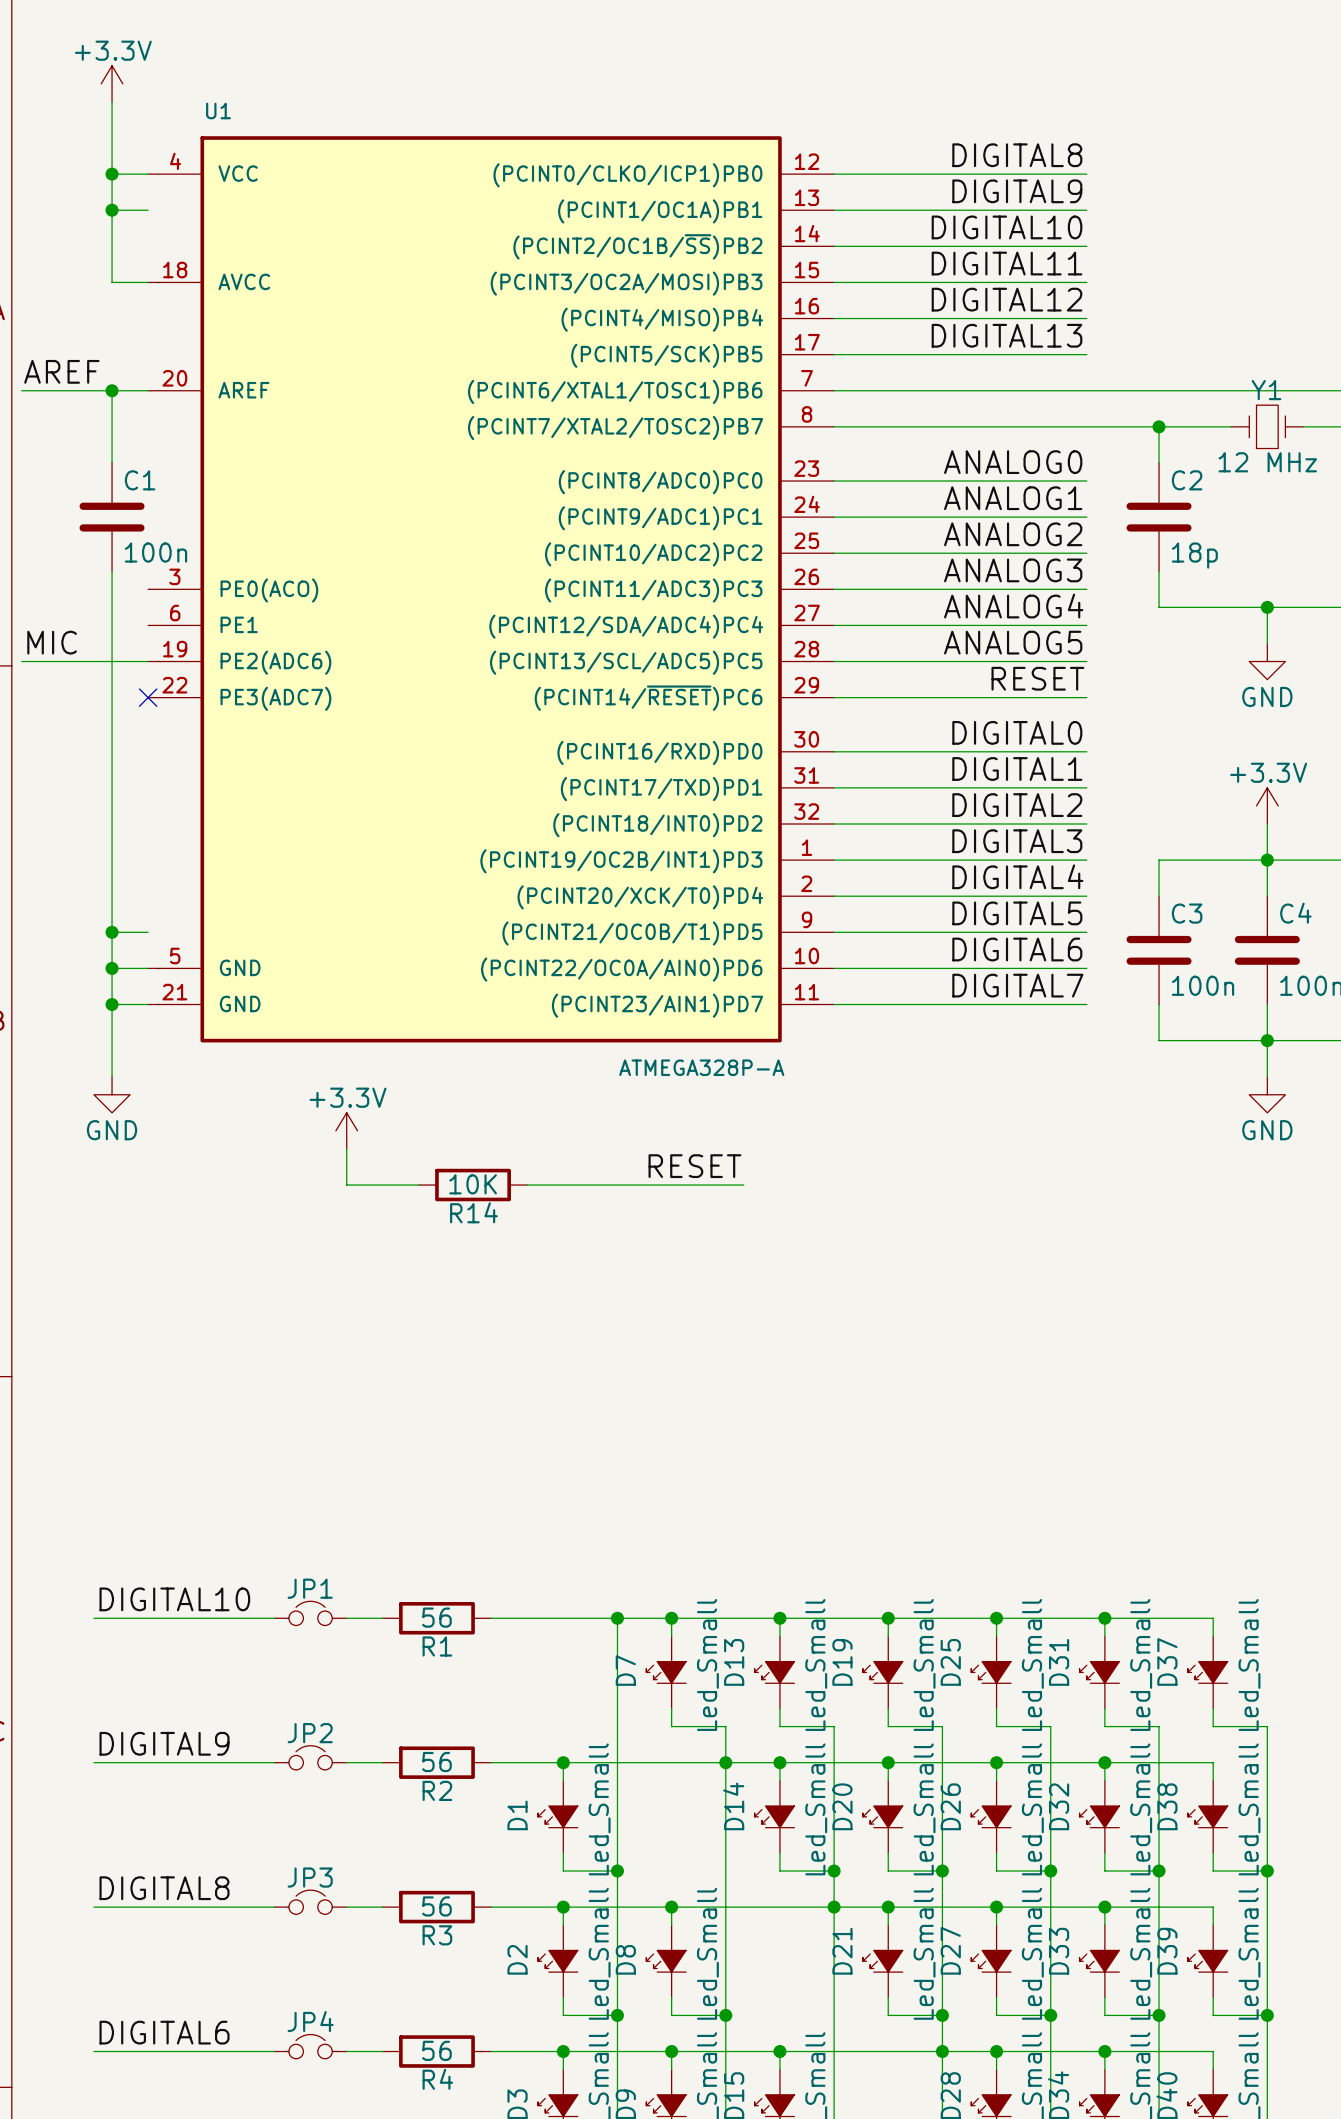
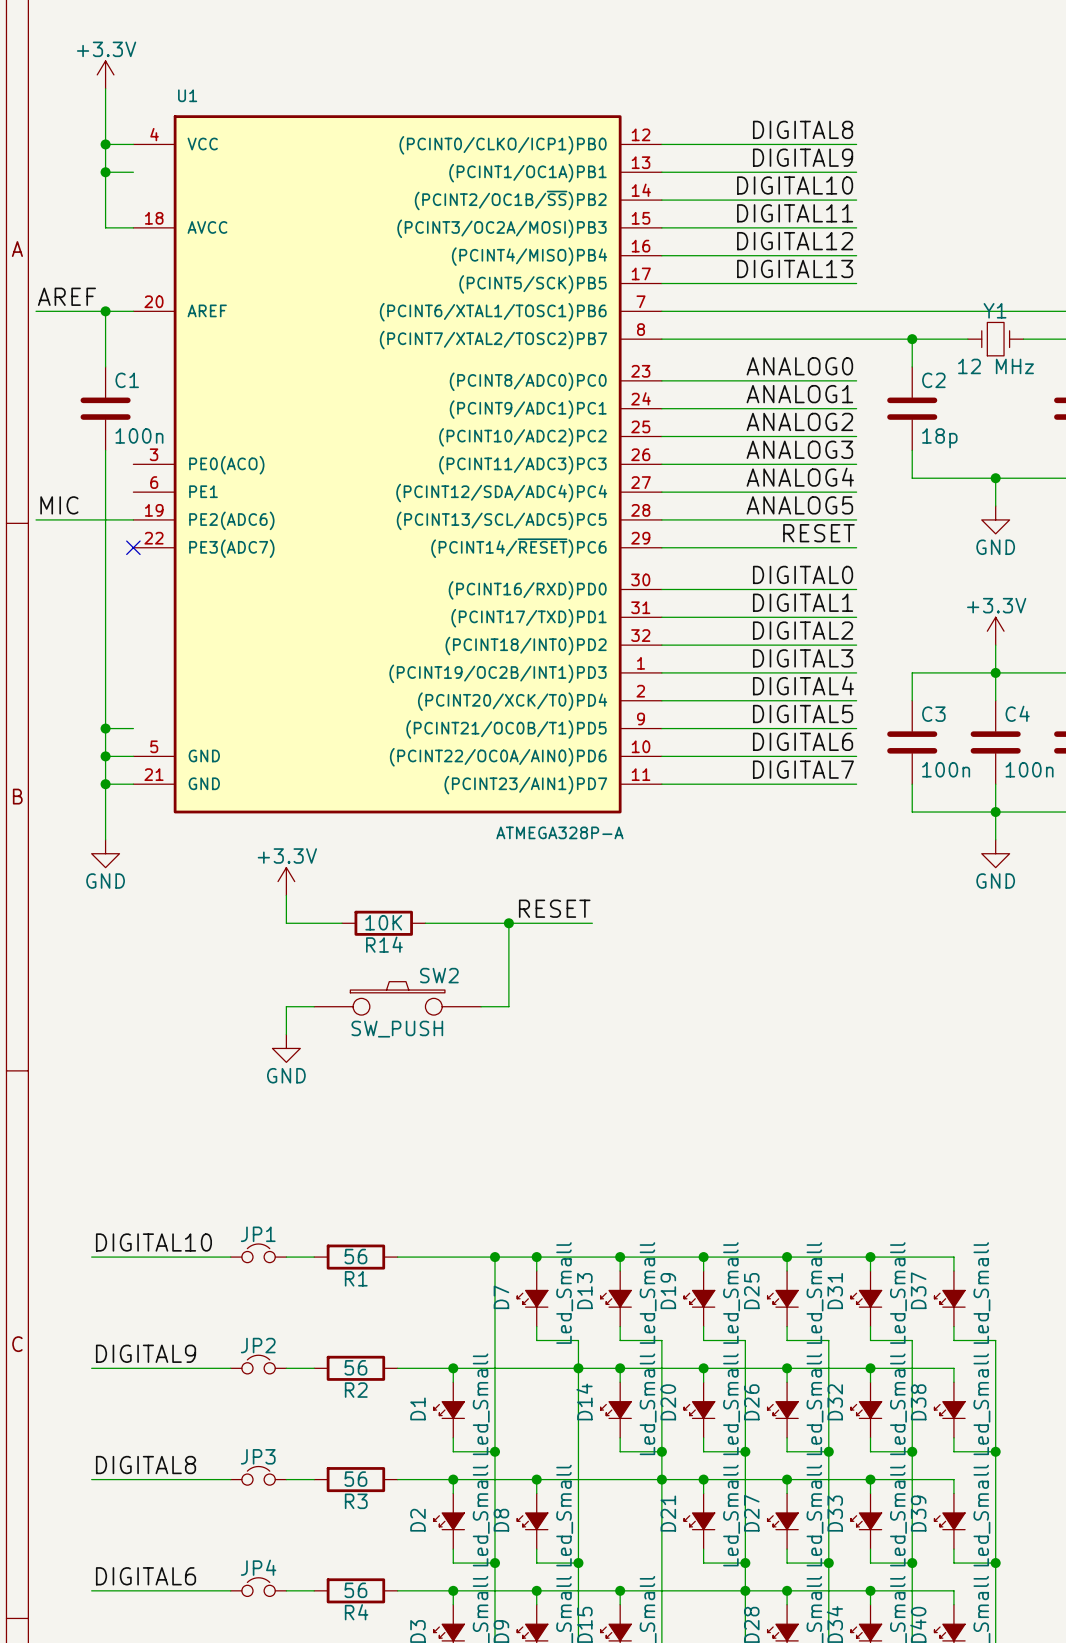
wire: none -> (508, 923) (508, 1006) (481, 1006)
junction: none -> (508, 923)
SW2: none -> SW_PUSH (397, 998)
wire: none -> (314, 1006) (286, 1006) (286, 1034)
power symbol: none -> GND (286, 1048)

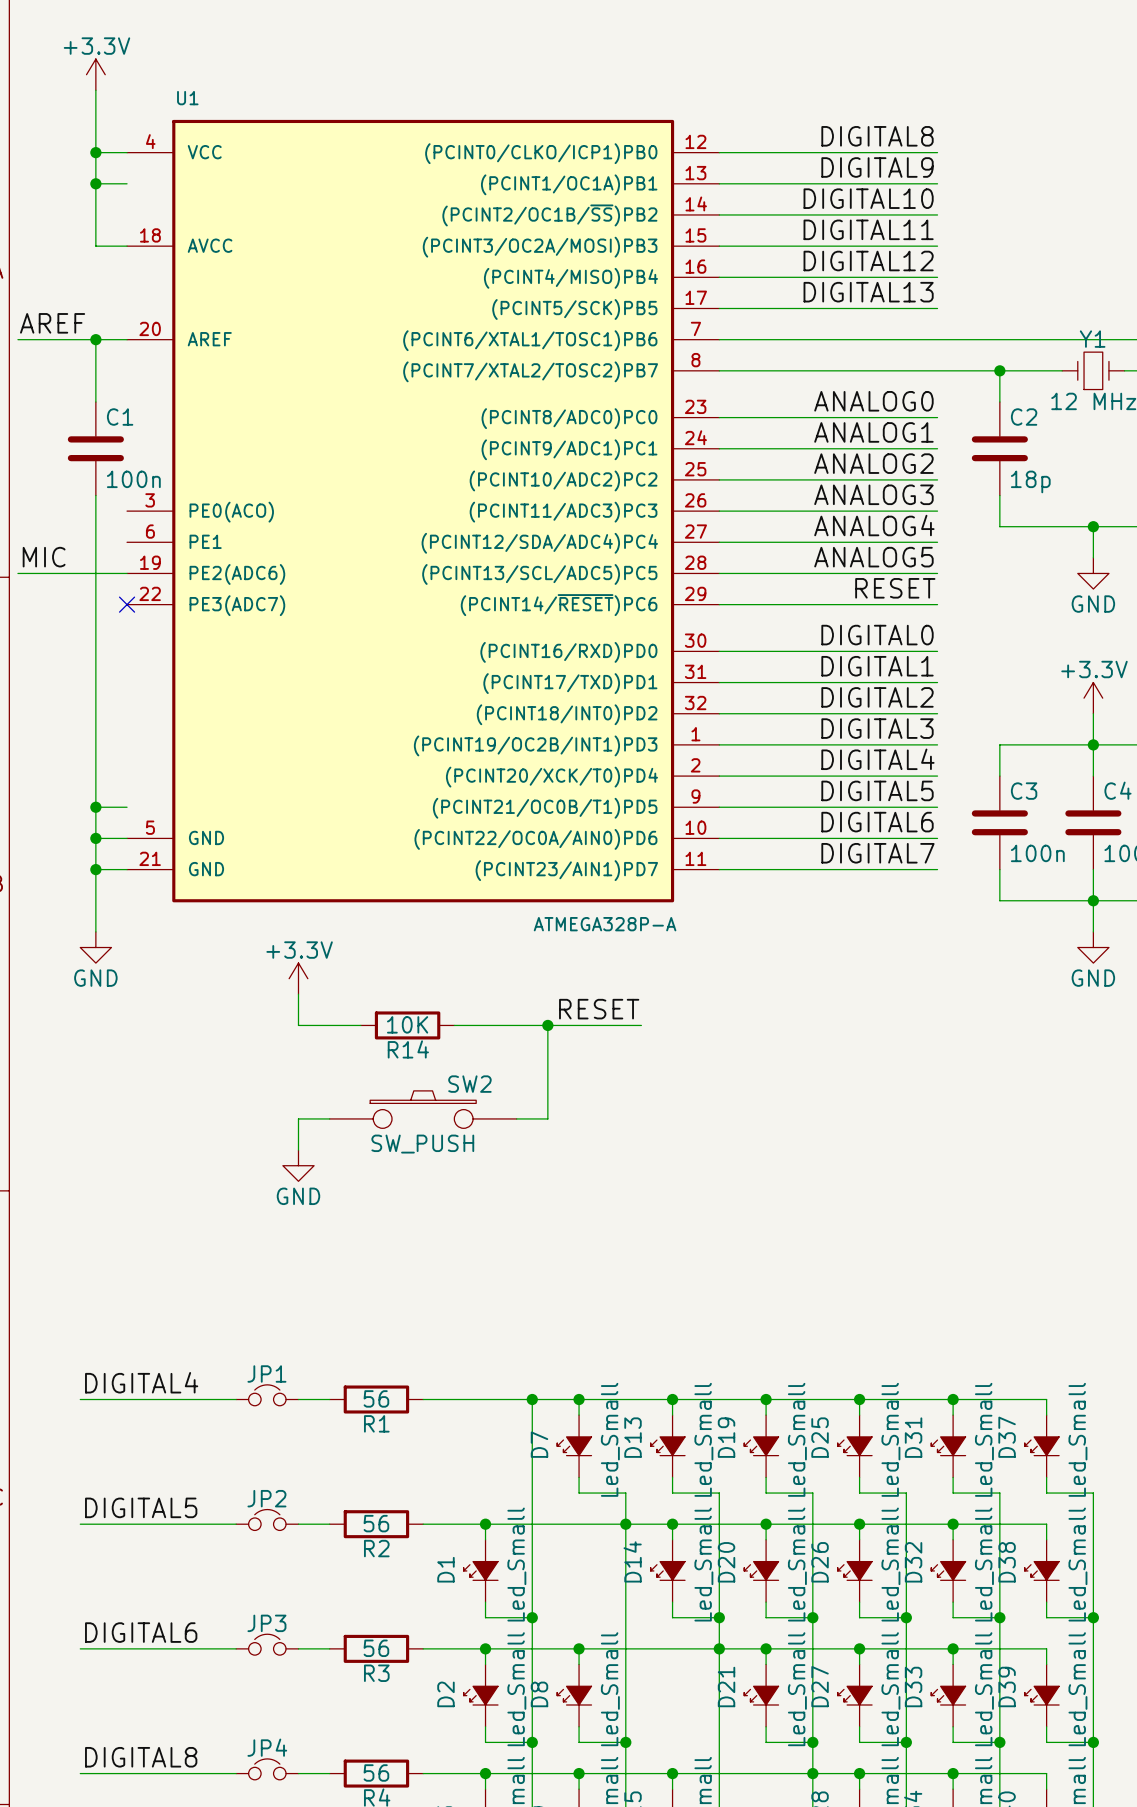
label: DIGITAL10 (153, 1242) -> DIGITAL4 (141, 1382)
label: DIGITAL9 (146, 1353) -> DIGITAL5 (141, 1507)
label: DIGITAL8 (146, 1465) -> DIGITAL6 (141, 1632)
label: DIGITAL6 (146, 1576) -> DIGITAL8 (141, 1757)

